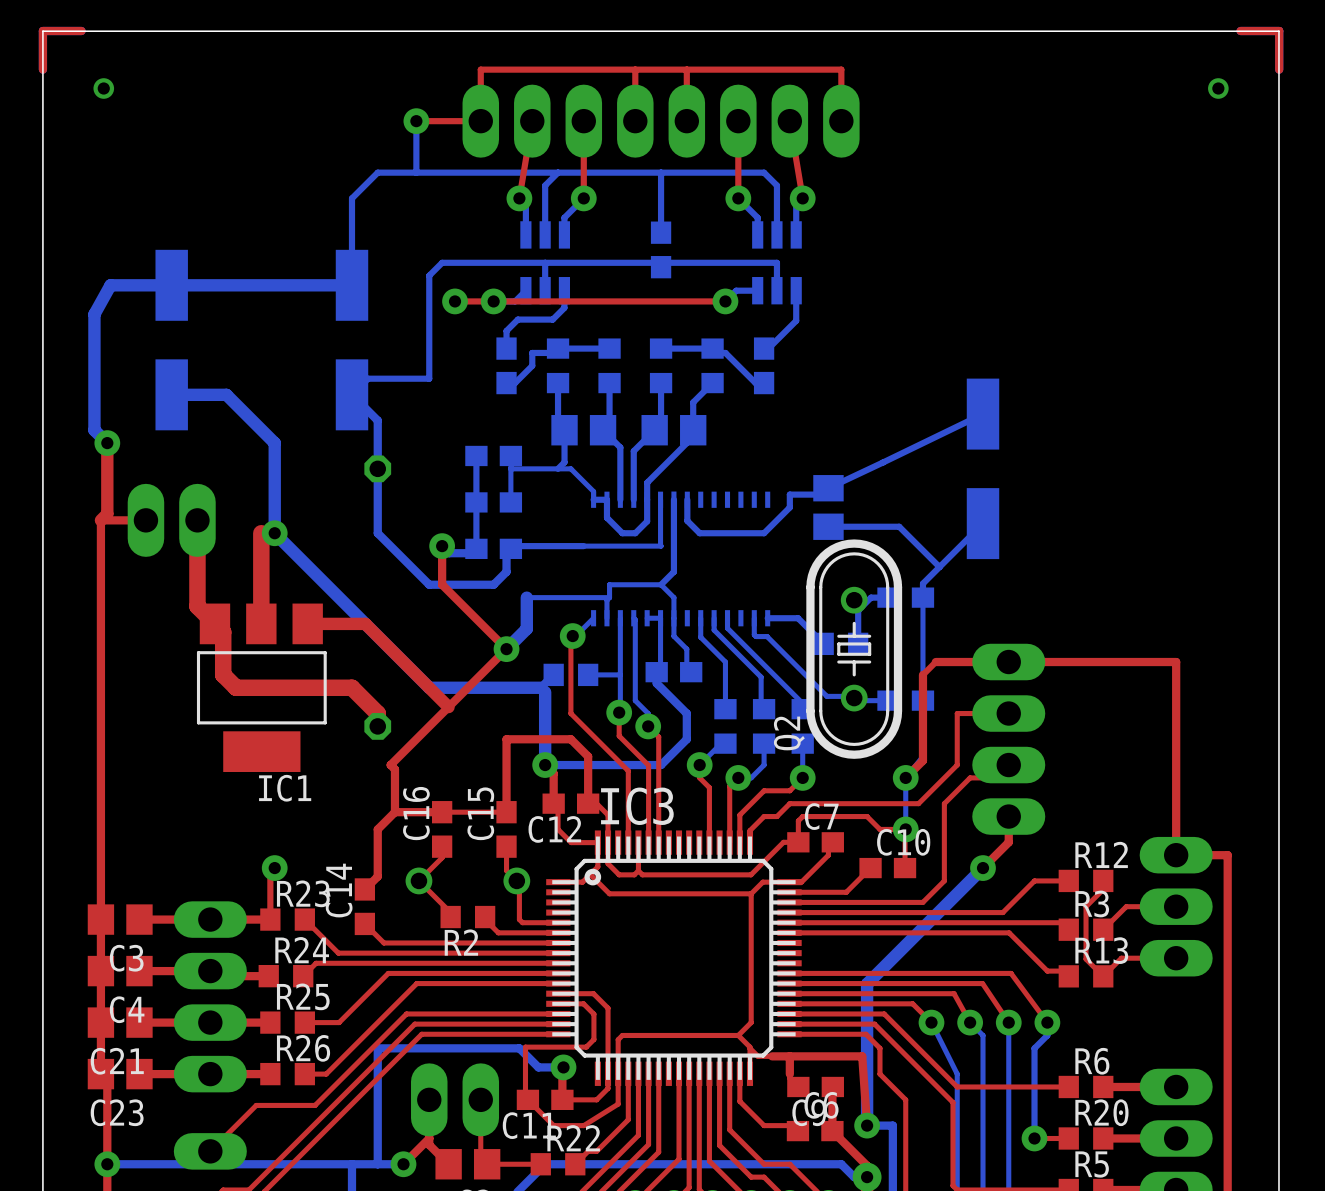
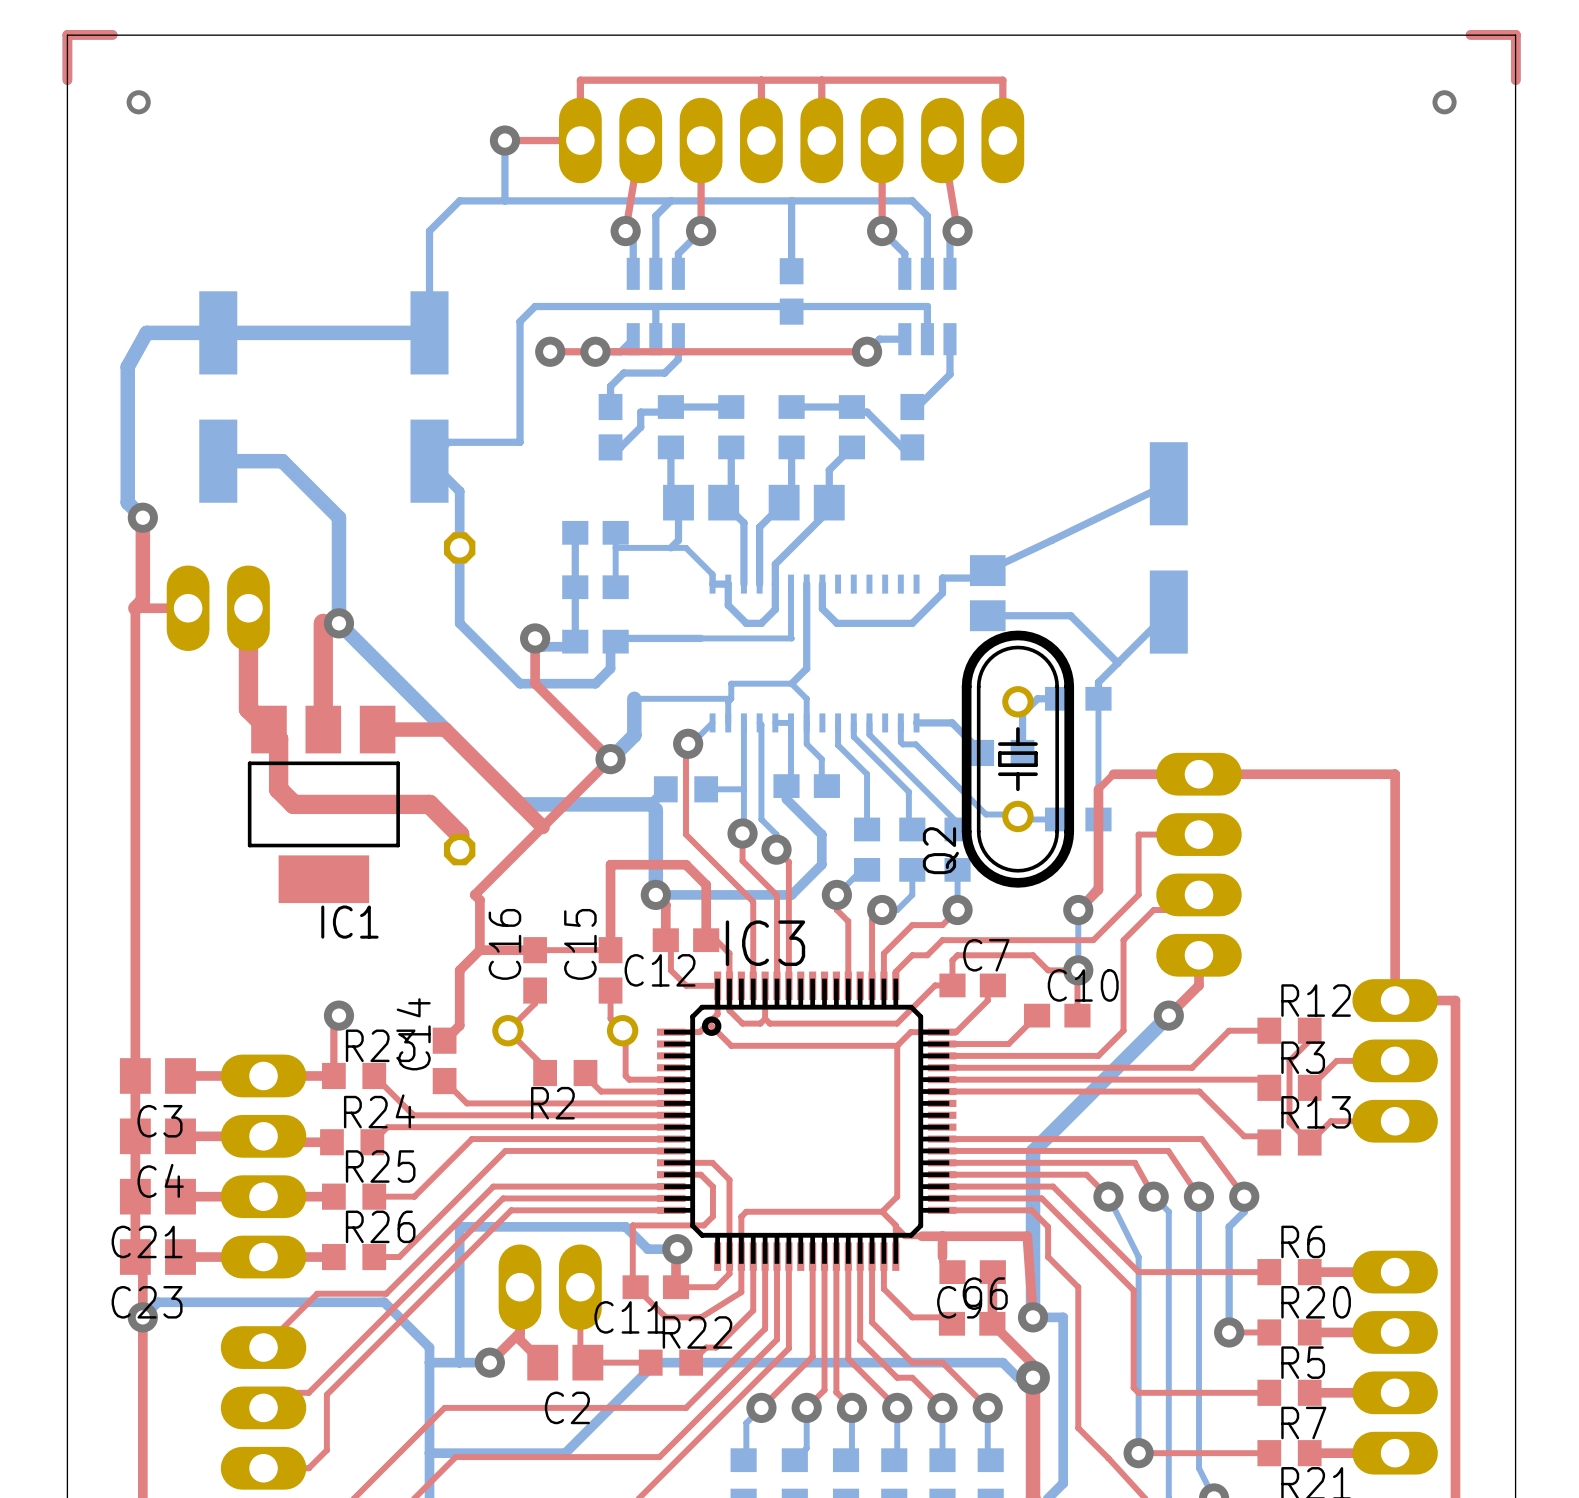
bottom track: (107, 1164) (351, 1164) -> (142, 1317) (157, 1302) (384, 1302) (429, 1347) (429, 1362)
via position: (107, 1164) -> (142, 1317)

